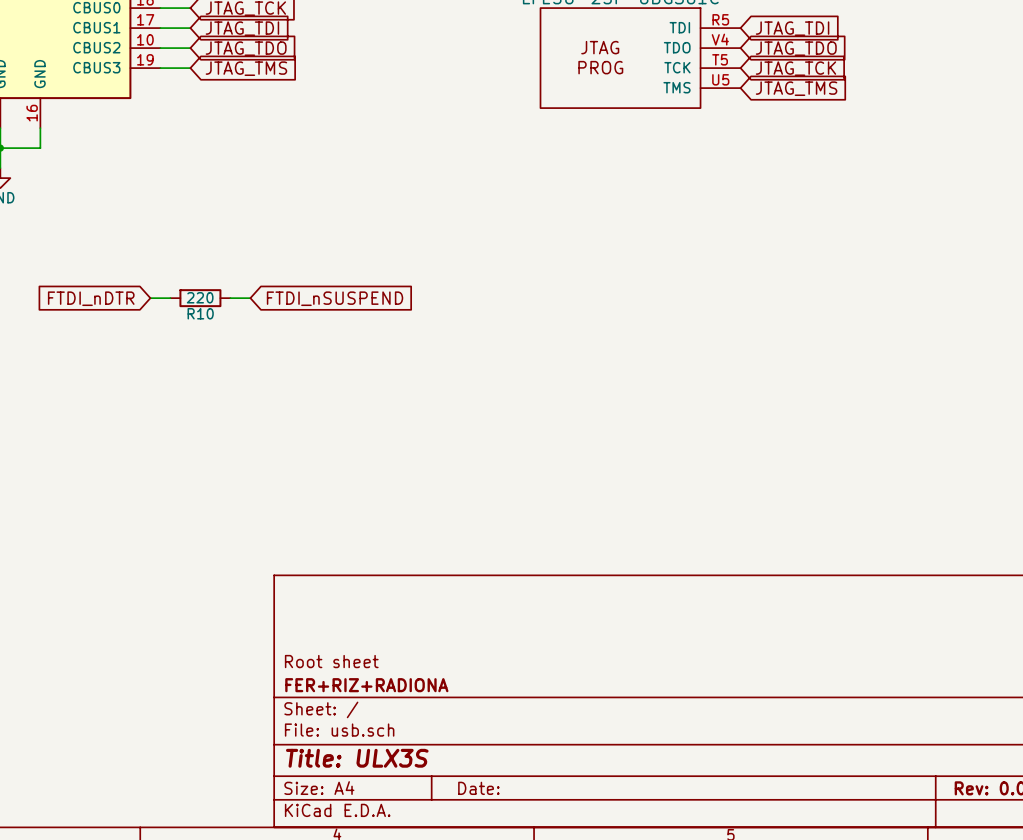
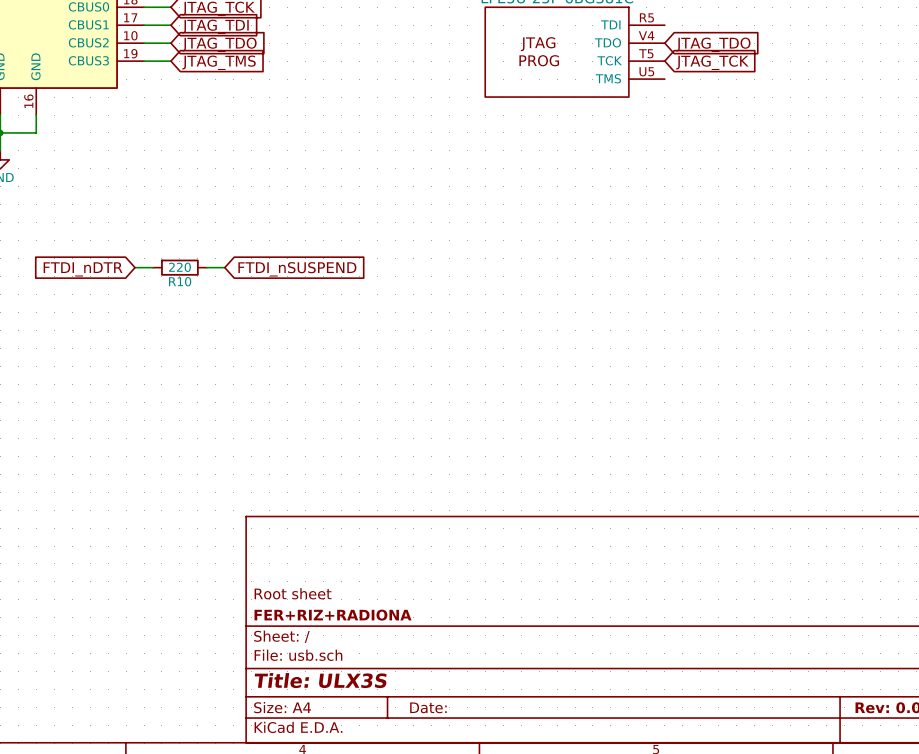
global label: JTAG_TDI (792, 28) -> none
global label: JTAG_TMS (796, 88) -> none

